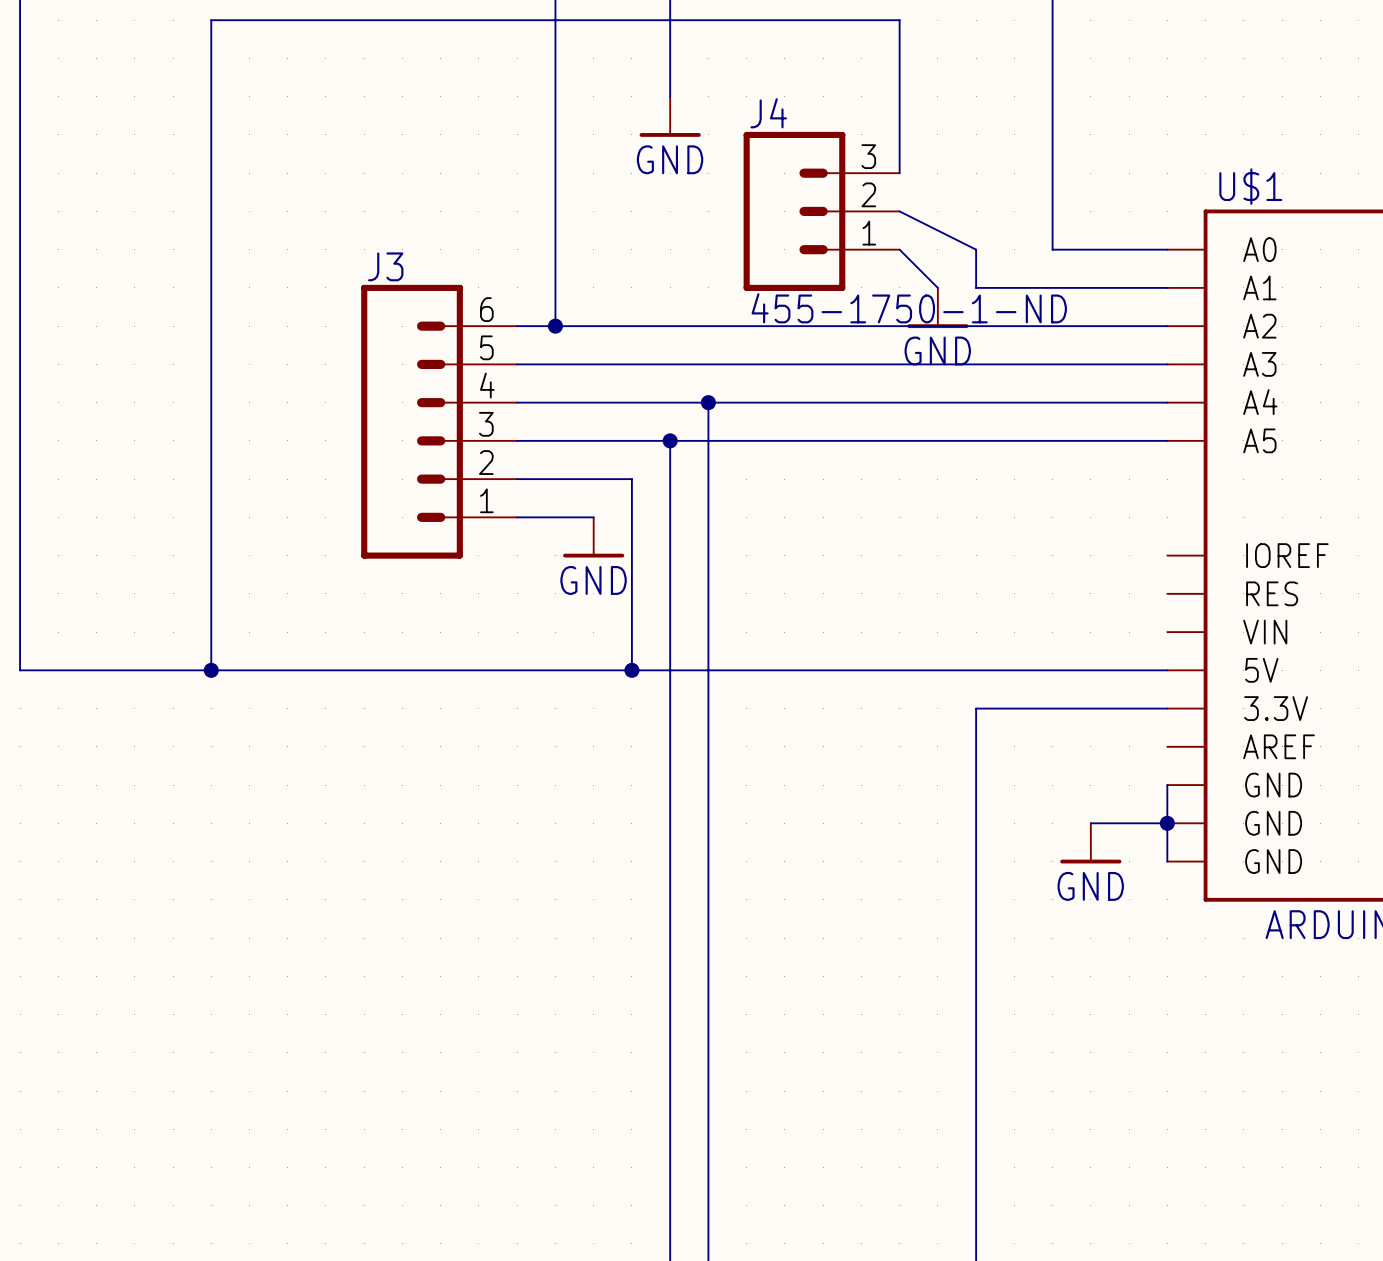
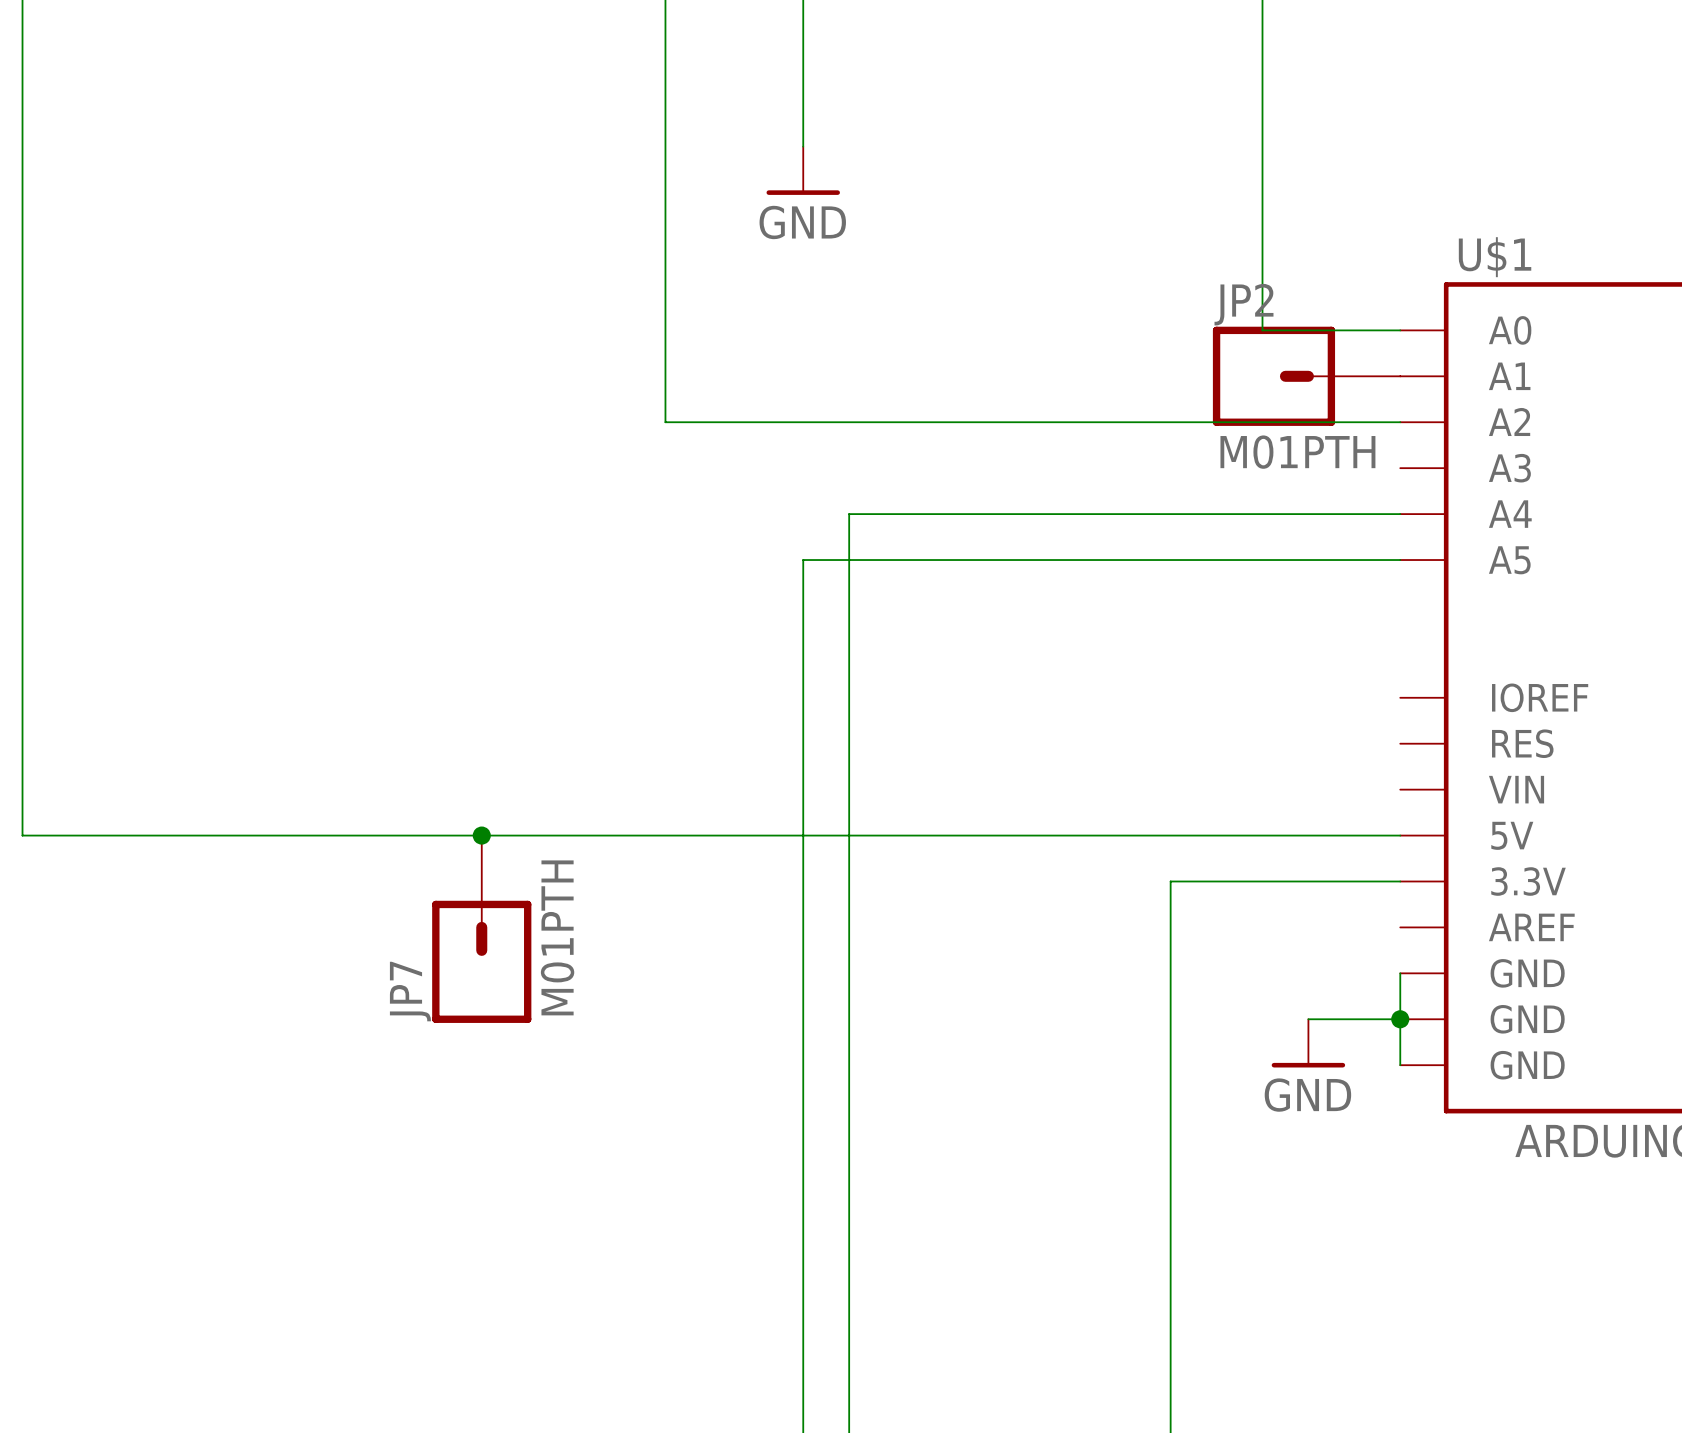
wire: (899, 173) (899, 20) (211, 20) (211, 670) -> none
J4: 455-1750-1-ND (821, 211) -> none
wire: (899, 211) (976, 249) (976, 287) (1167, 287) -> none
wire: (899, 249) (937, 287) -> none
JP2: none -> M01PTH (1306, 376)
power symbol: GND (937, 307) -> none
wire: (517, 326) (555, 326) -> none
junction: (555, 326) -> none
wire: (517, 364) (1167, 364) -> none
wire: (517, 402) (708, 402) -> none
junction: (708, 402) -> none
J3: (439, 421) -> none
wire: (517, 440) (670, 440) -> none
junction: (670, 440) -> none
wire: (517, 479) (631, 479) (631, 670) -> none
wire: (517, 517) (593, 517) -> none
power symbol: GND (593, 537) -> none
junction: (211, 670) -> none
junction: none -> (481, 835)
junction: (631, 670) -> none
JP7: none -> M01PTH (481, 929)

